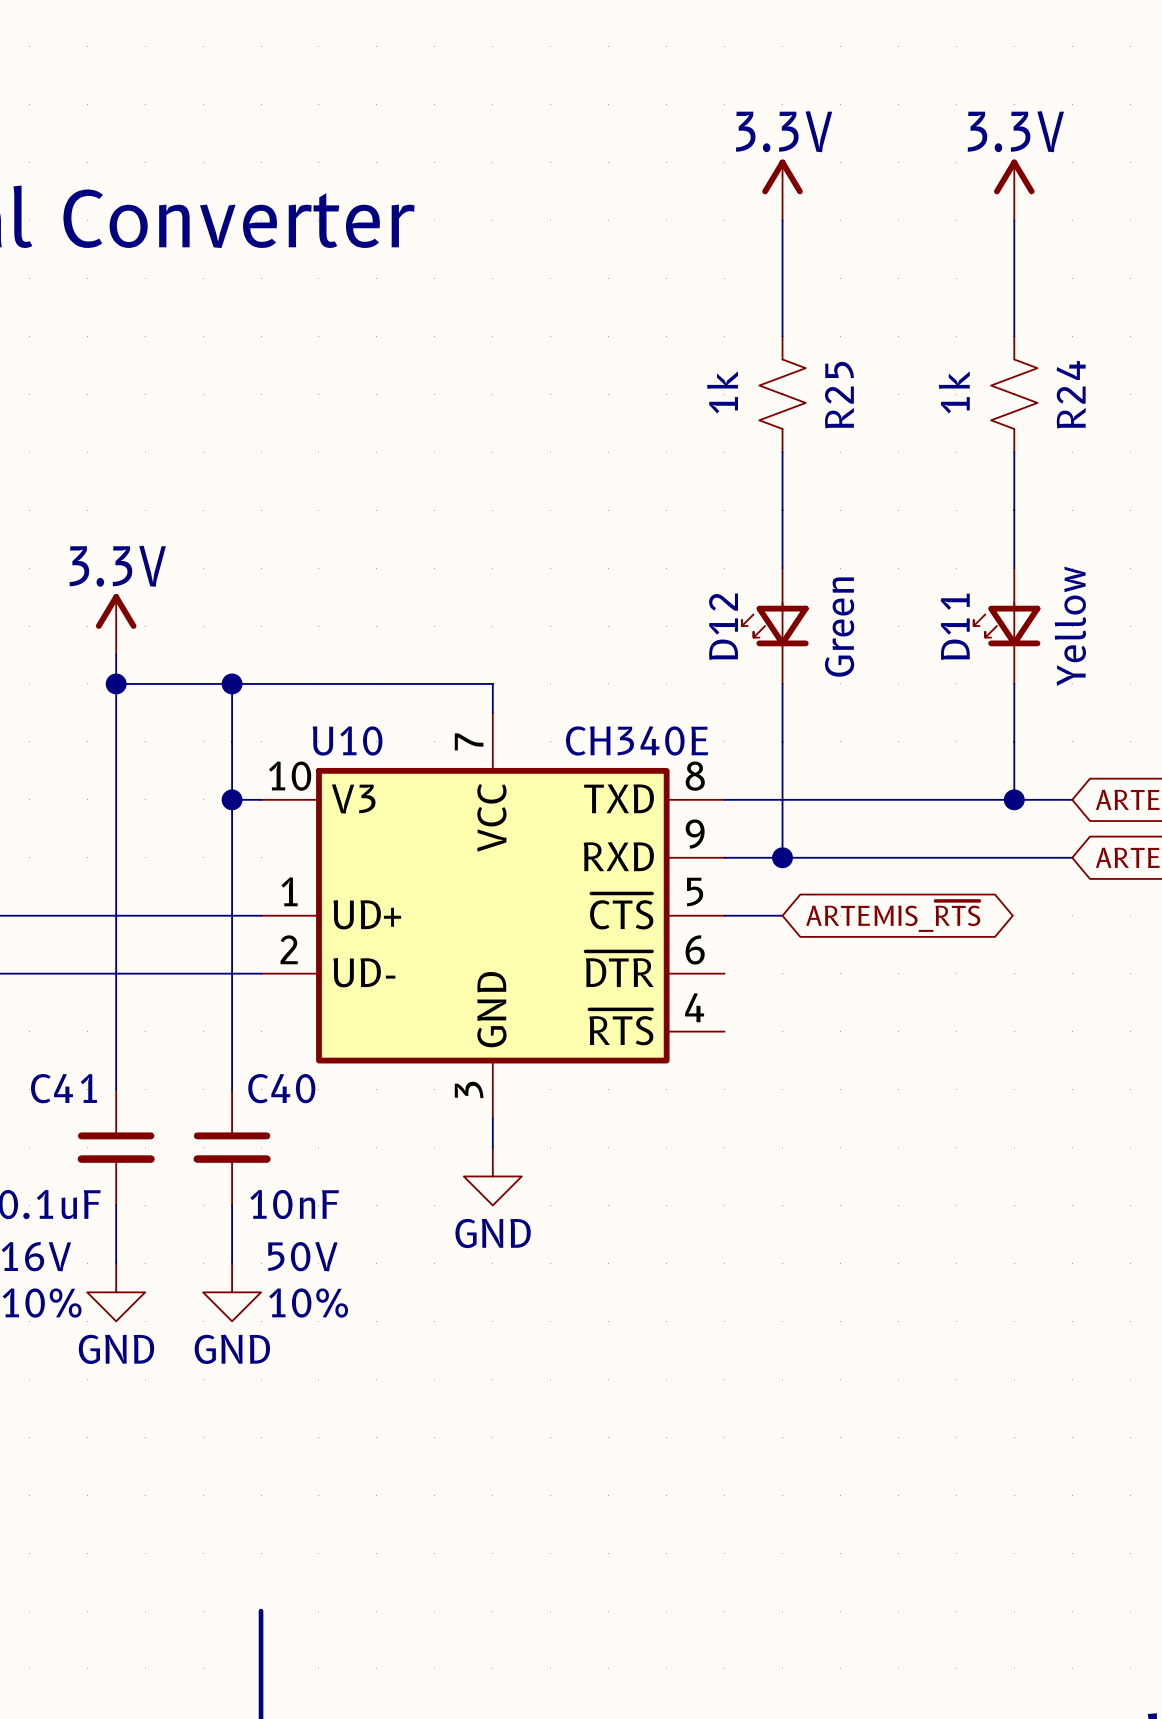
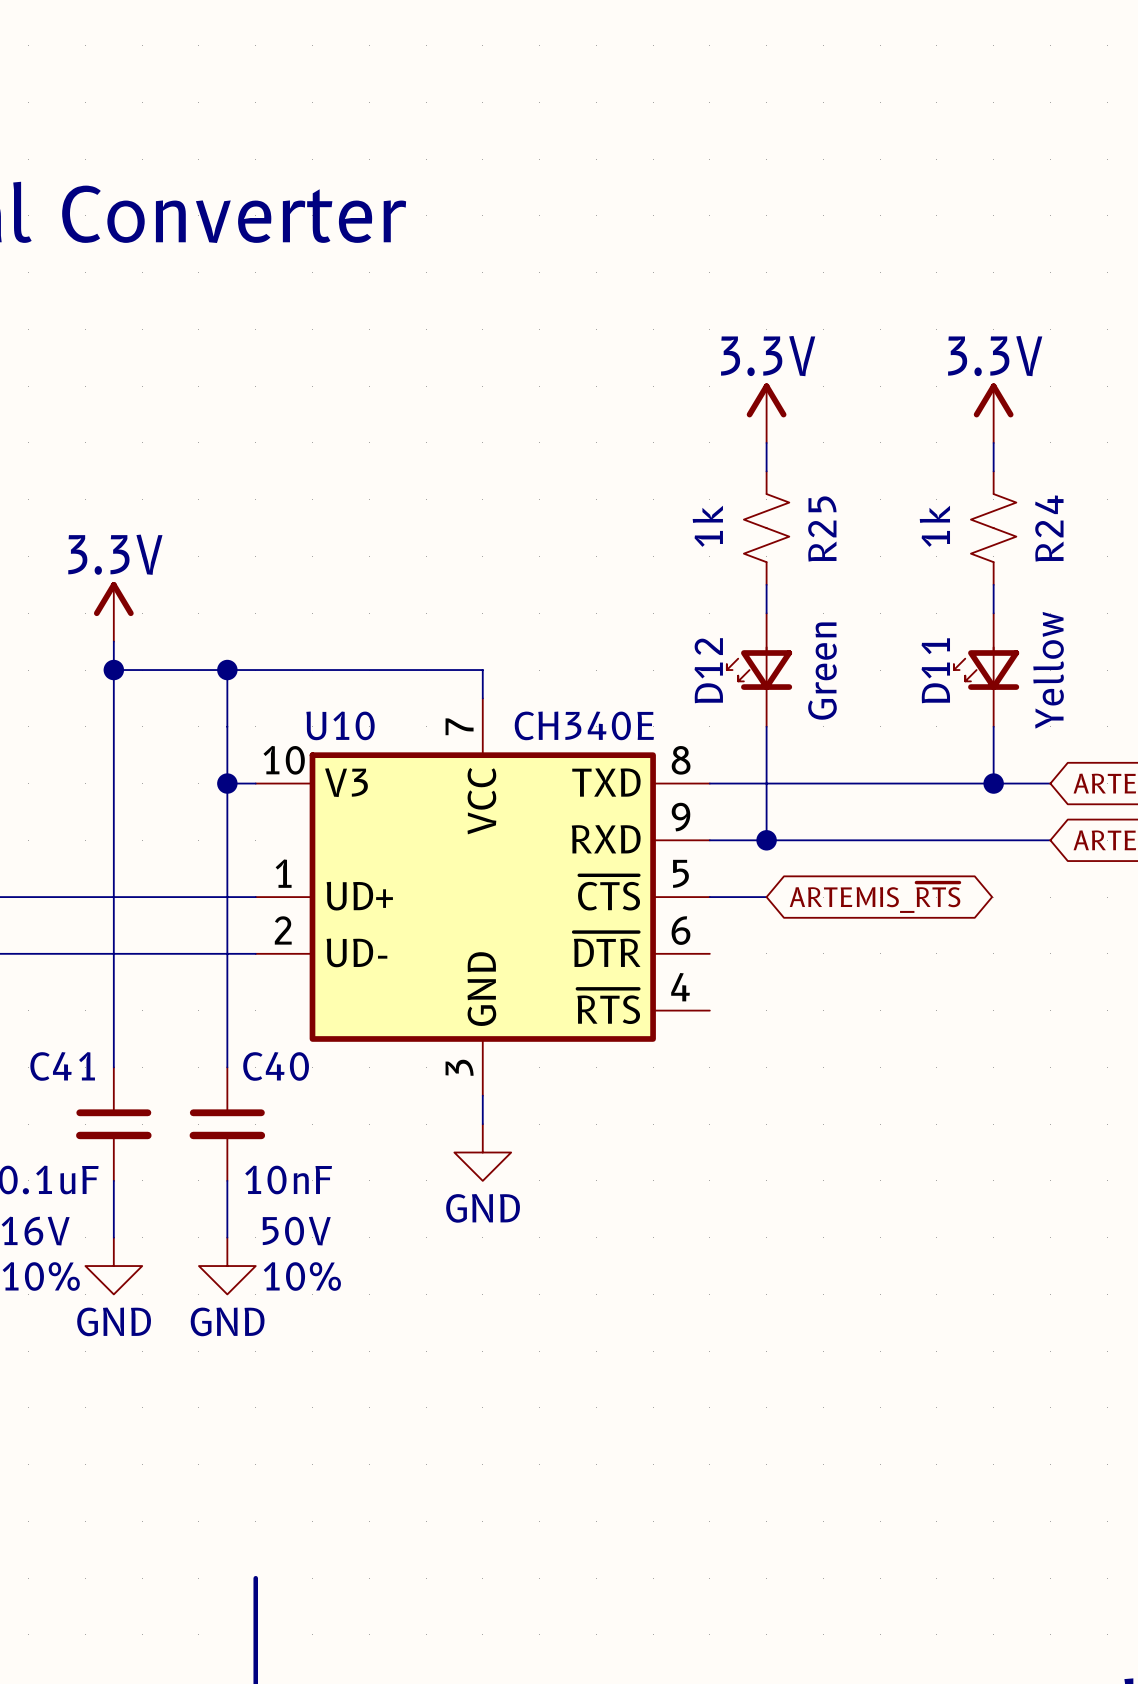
power symbol: 3.3V (782, 189) -> none
power symbol: 3.3V (1014, 189) -> none
wire: (782, 220) (782, 336) -> none
wire: (1014, 220) (1014, 336) -> none
R25 position: (782, 394) -> (766, 528)
R24 position: (1014, 394) -> (993, 528)
power symbol: none -> 3.3V (766, 413)
power symbol: none -> 3.3V (993, 413)
wire: (782, 481) (782, 568) -> none
wire: (1014, 481) (1014, 568) -> none
D12 position: (775, 626) -> (759, 670)
D11 position: (1007, 626) -> (986, 670)
U10 value position: CH340E (637, 740) -> CH340E (584, 725)

